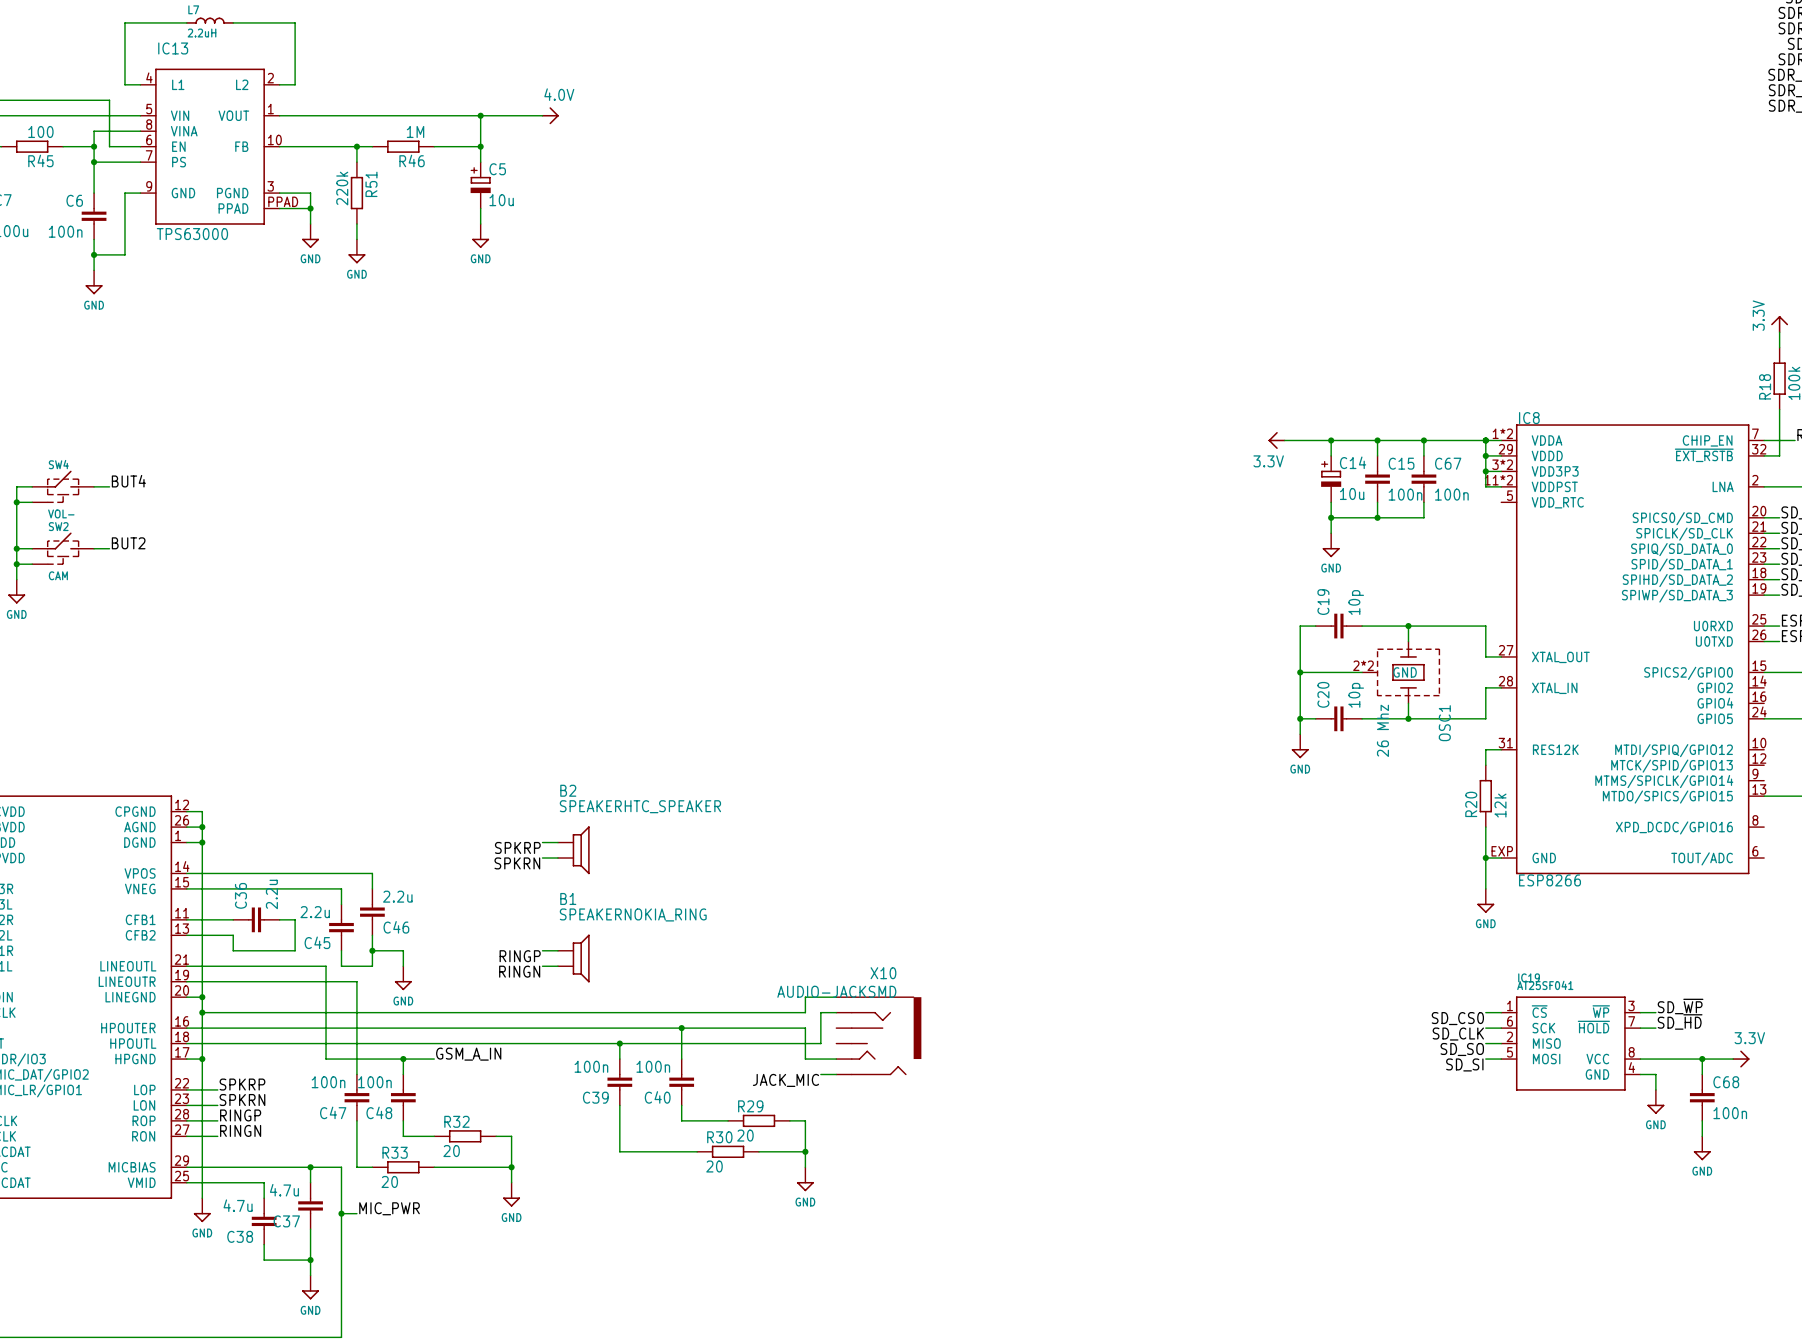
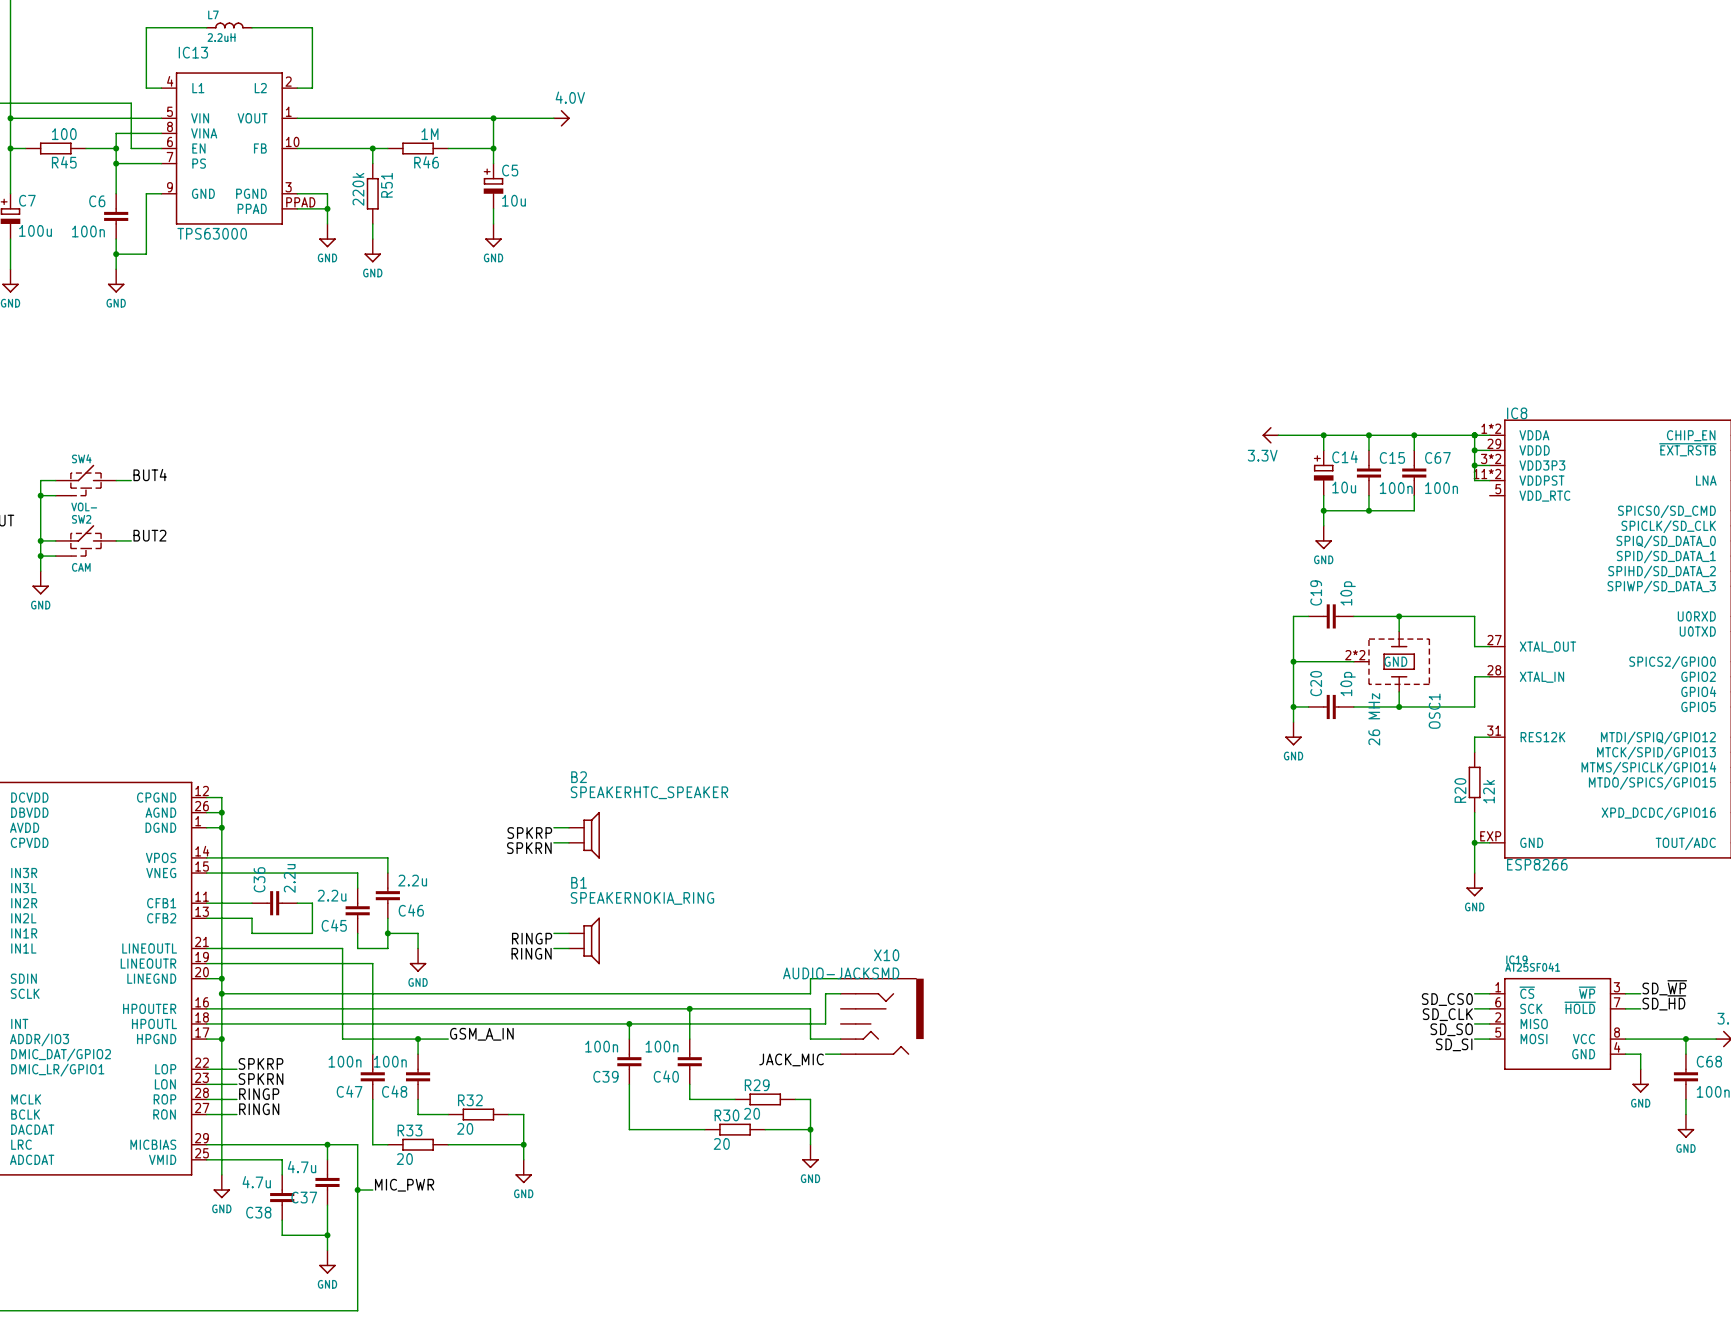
OSC1 value: 26 Mhz (1382, 730) -> 26 MHz (1374, 719)

